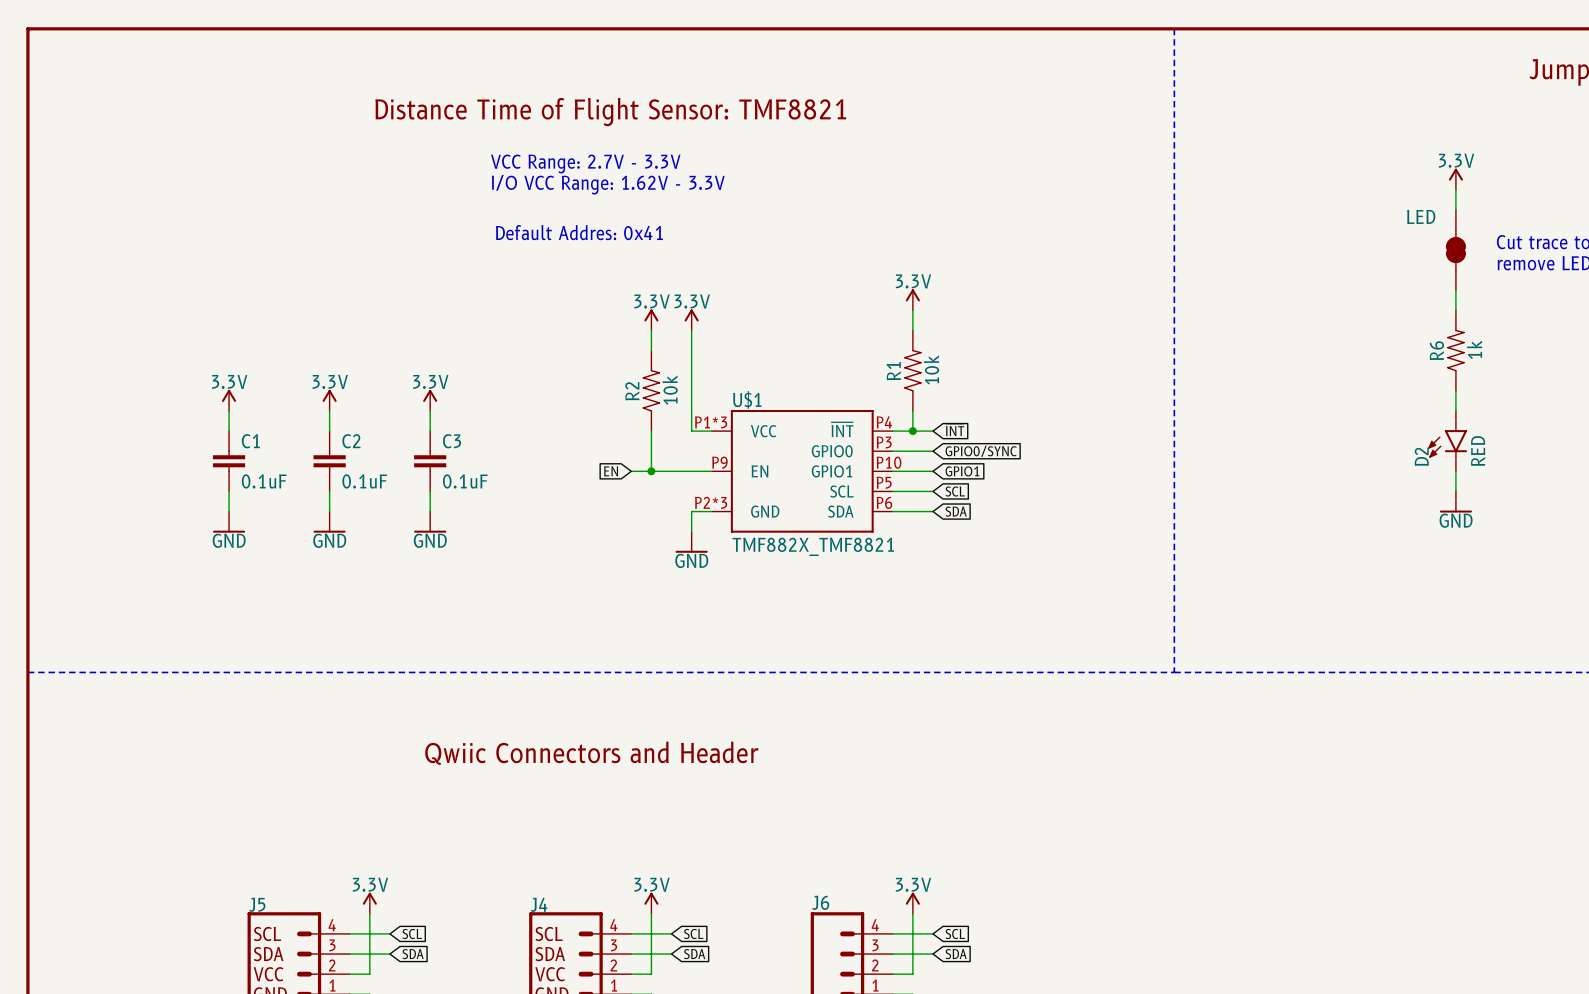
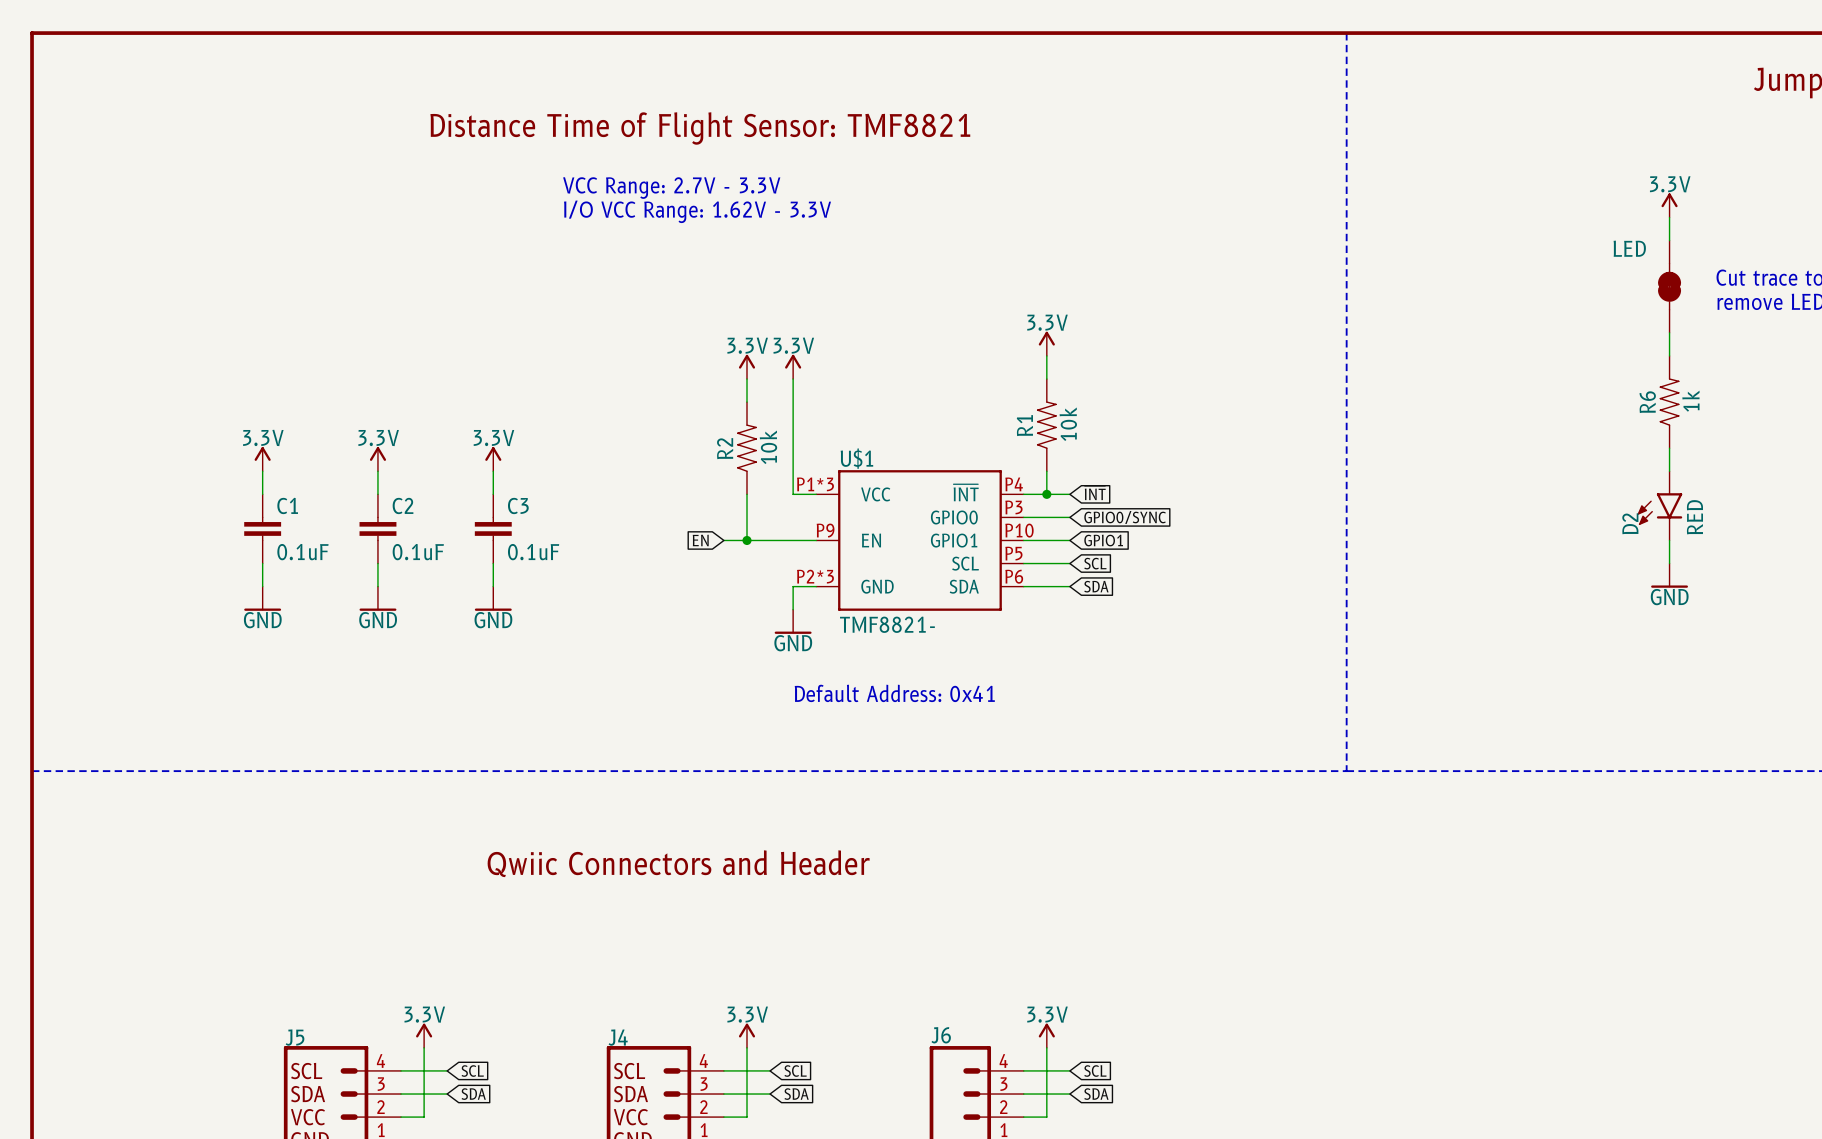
text: Default Addres: 0x41 (579, 232) -> none
U$1 value: TMF882X_TMF8821 (813, 546) -> TMF8821- (887, 624)
text: none -> Default Address: 0x41 (894, 693)

